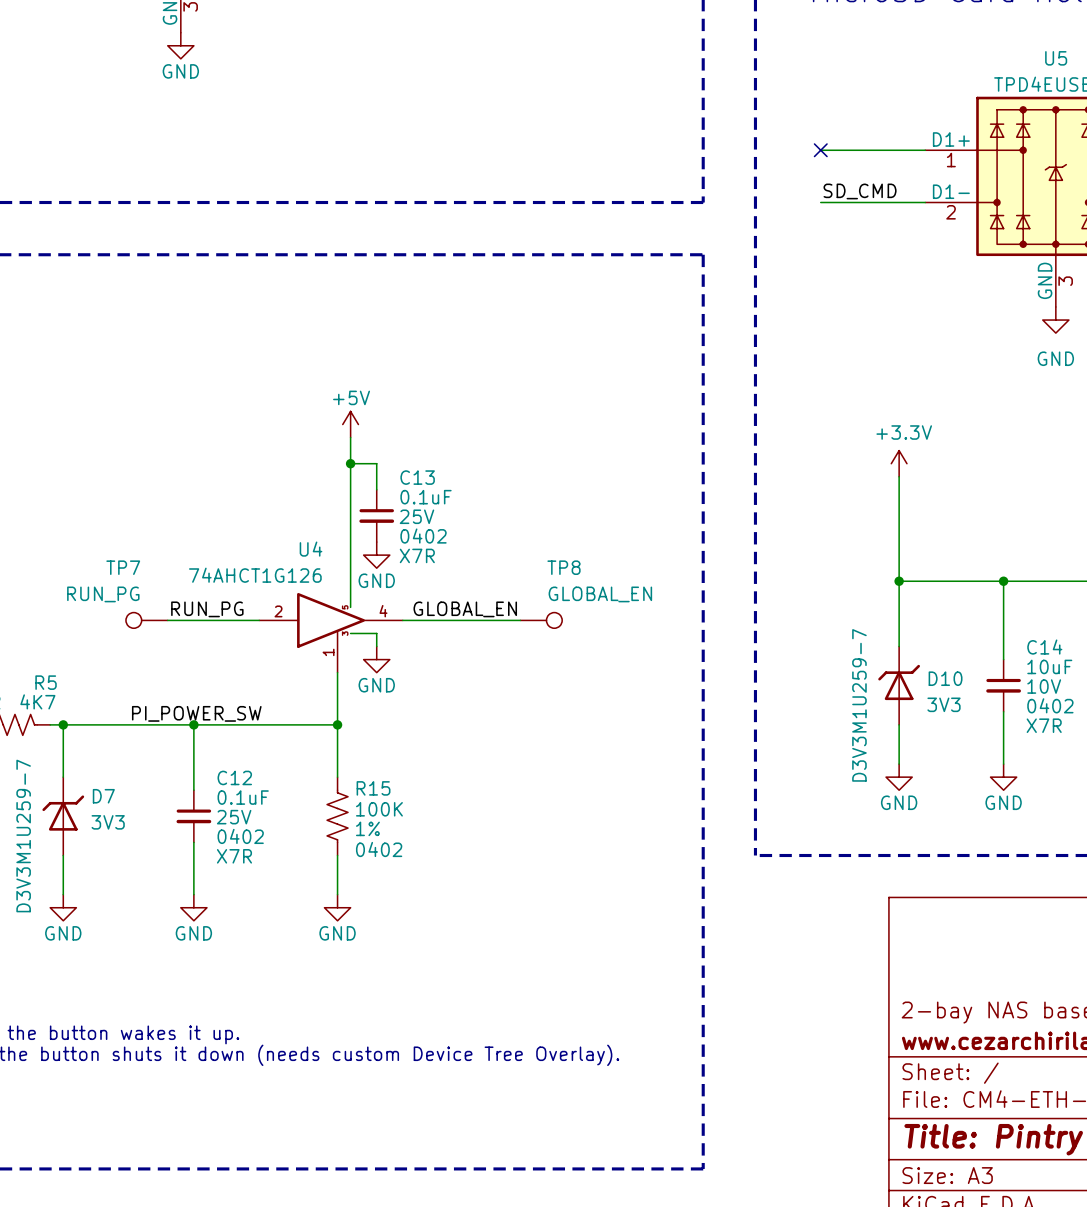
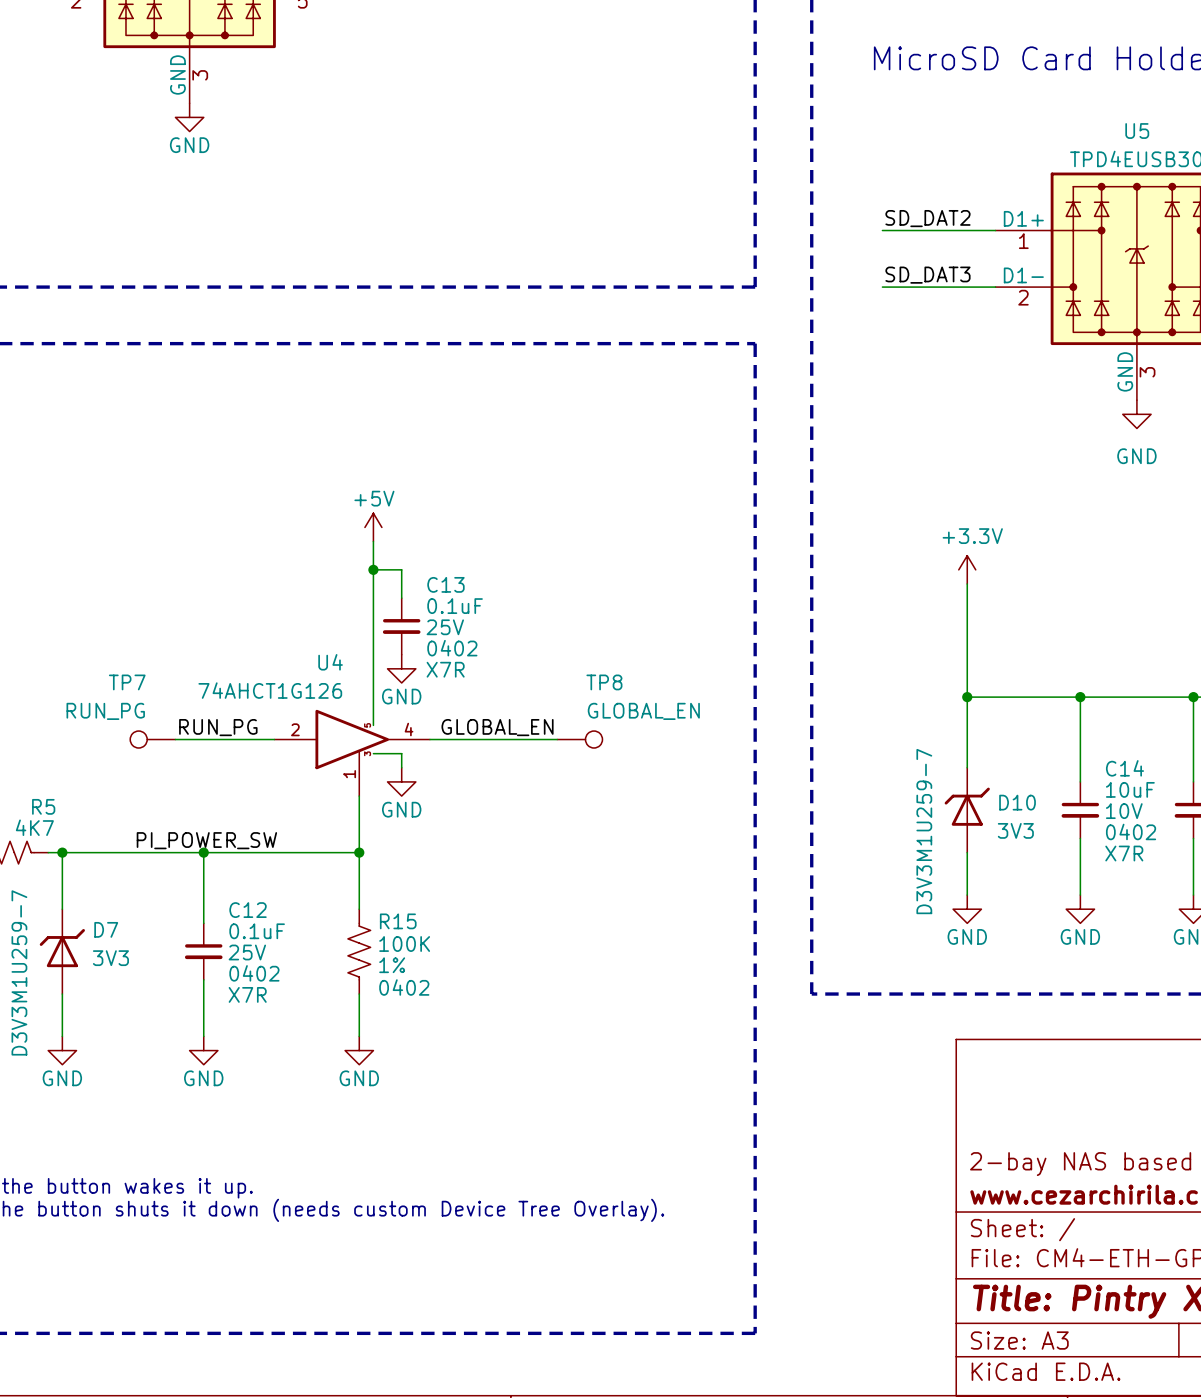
label: none -> SD_DAT2 (927, 218)
no-connect mark: (820, 150) -> none
label: SD_CMD (860, 191) -> SD_DAT3 (927, 275)

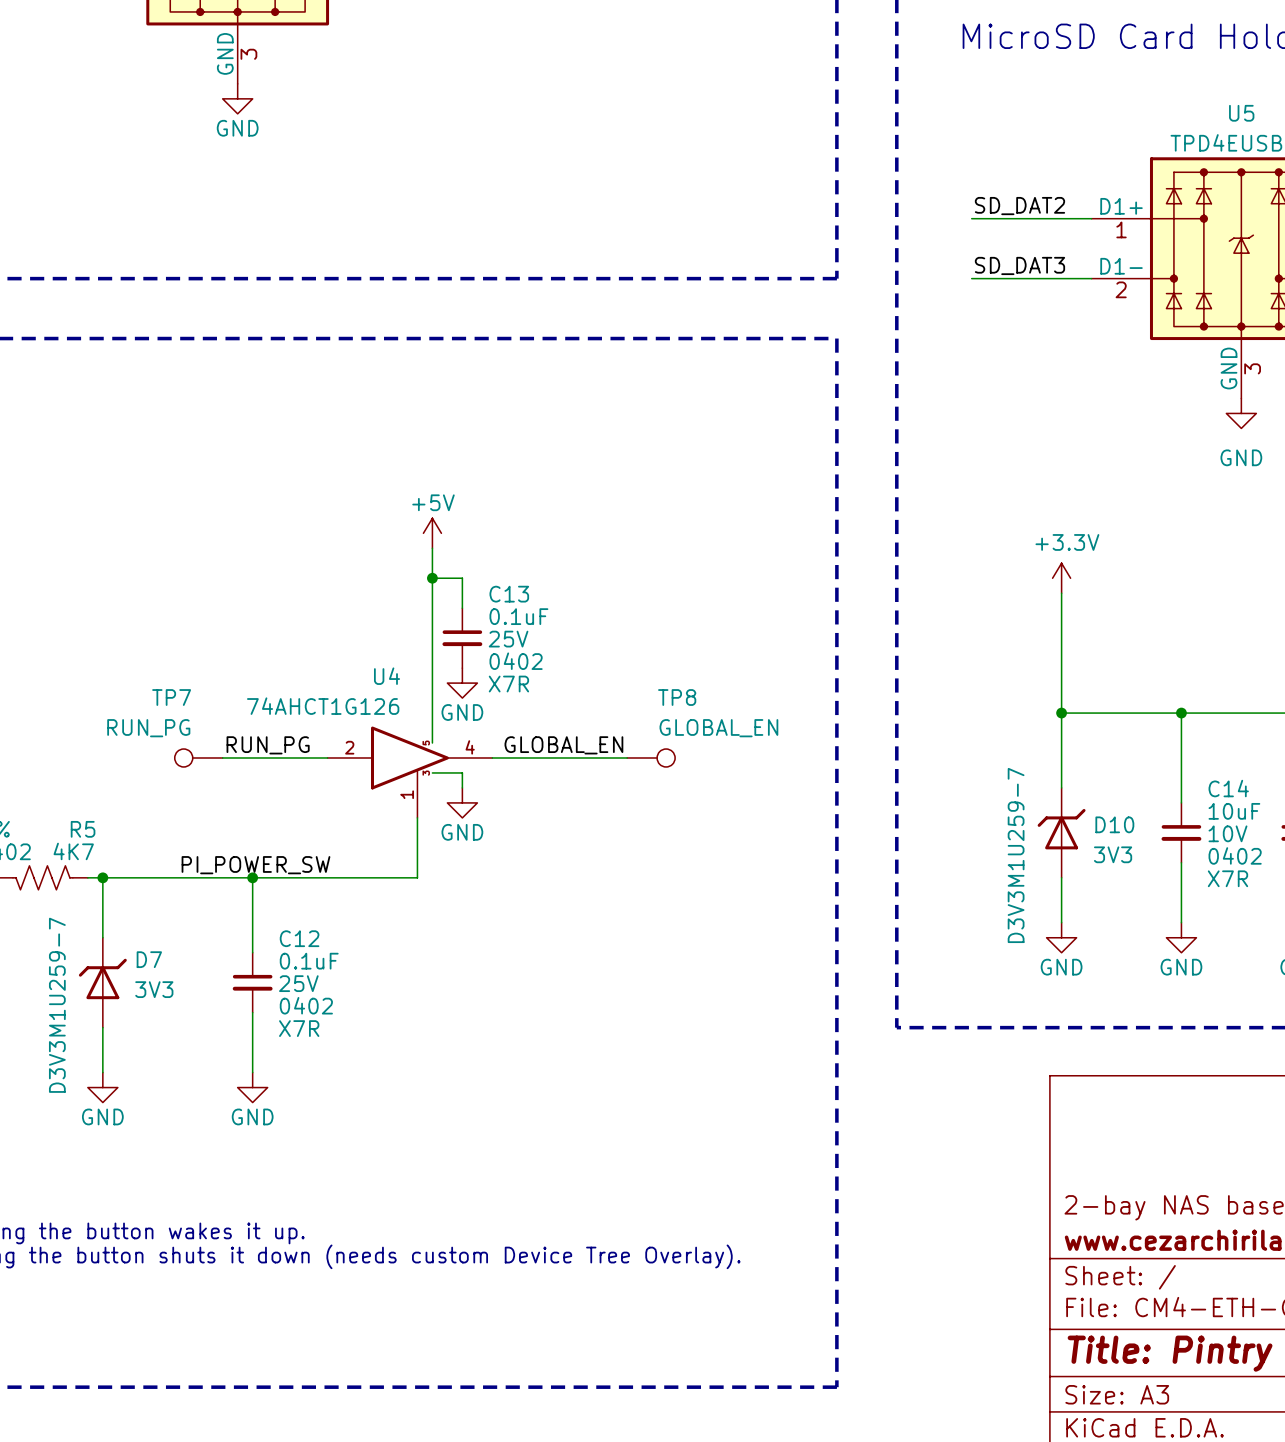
wire: (359, 852) (359, 909) -> none
junction: (359, 852) -> none
R15: 100K (359, 951) -> none
wire: (359, 994) (359, 1036) -> none
power symbol: GND (359, 1050) -> none

